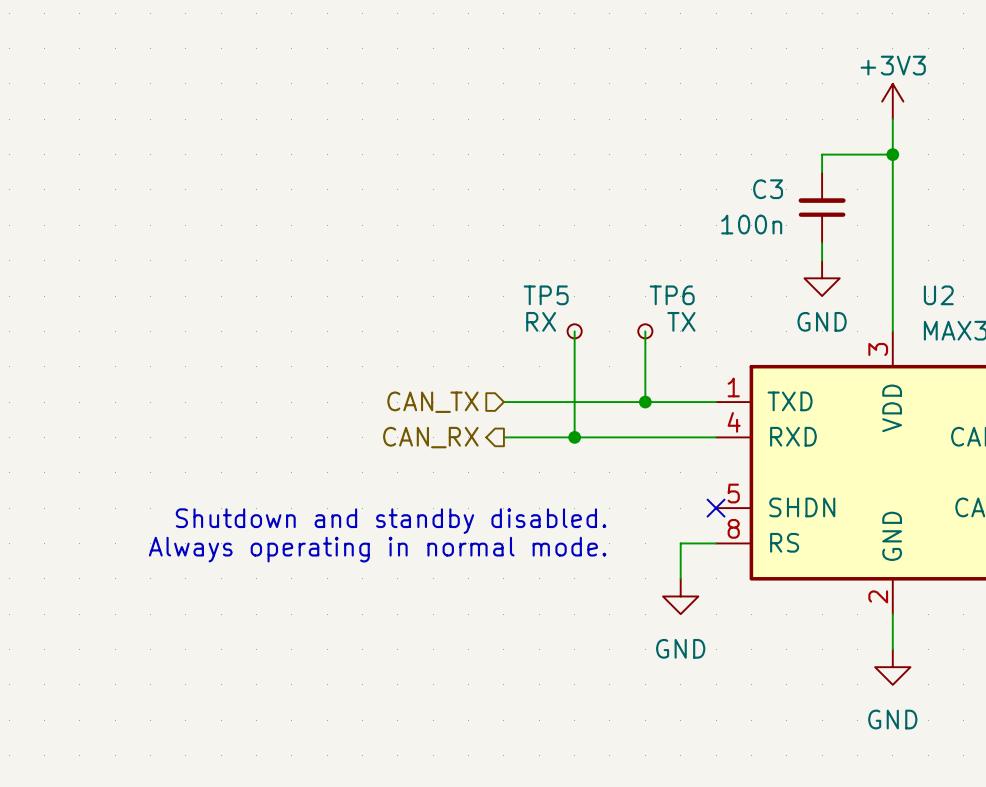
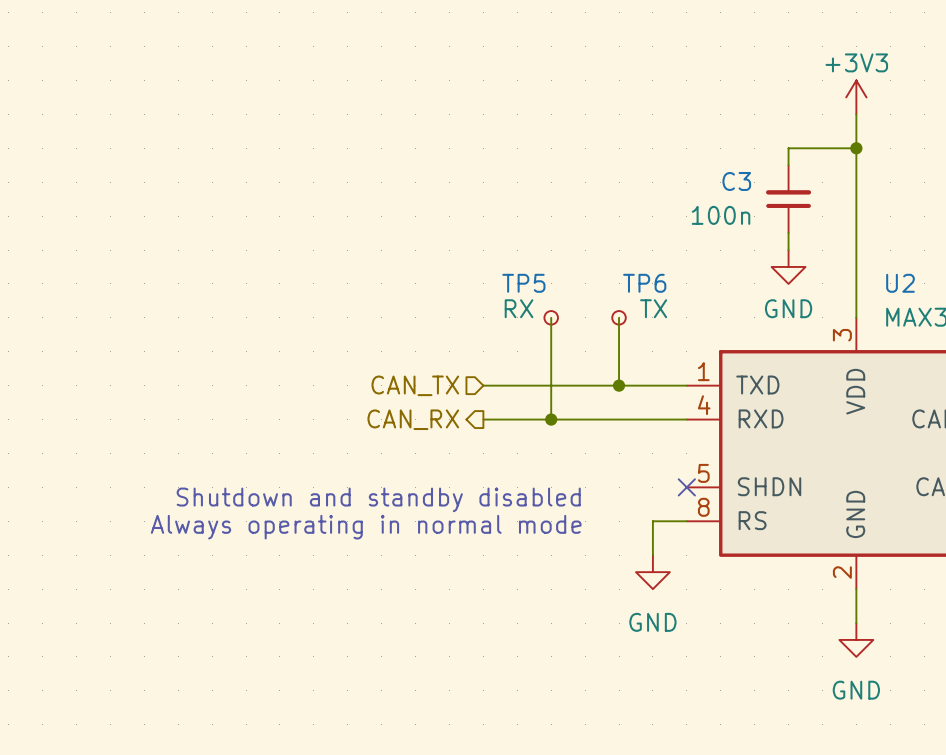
text: Shutdown and standby disabled. (391, 521) -> Shutdown and standby disabled (378, 499)
text: Always operating in normal mode. (377, 549) -> Always operating in normal mode (366, 527)

